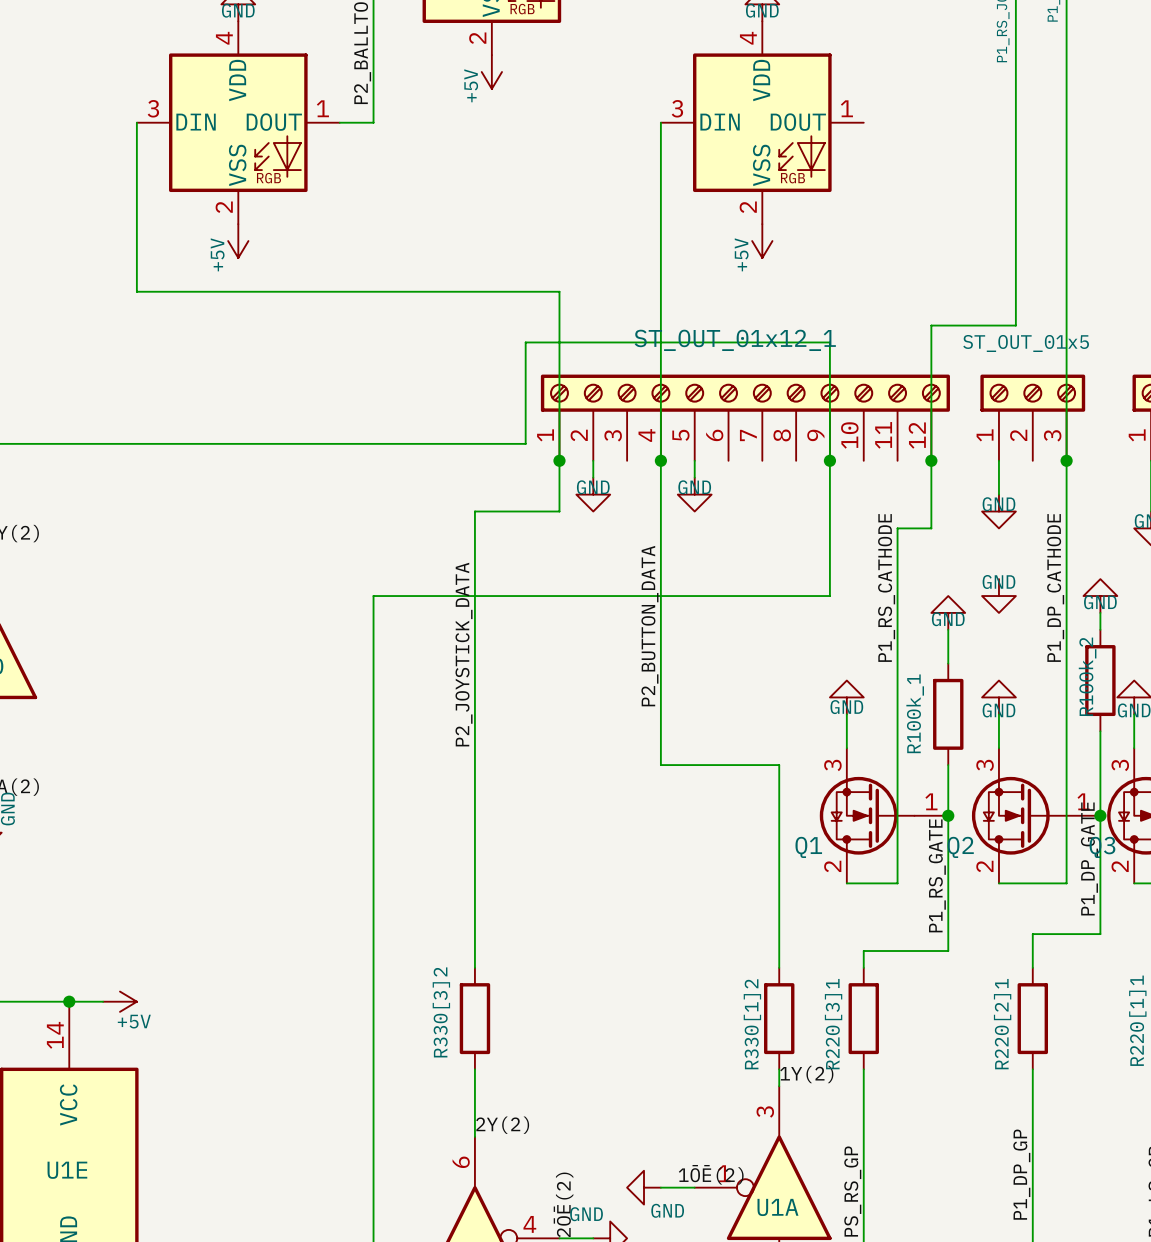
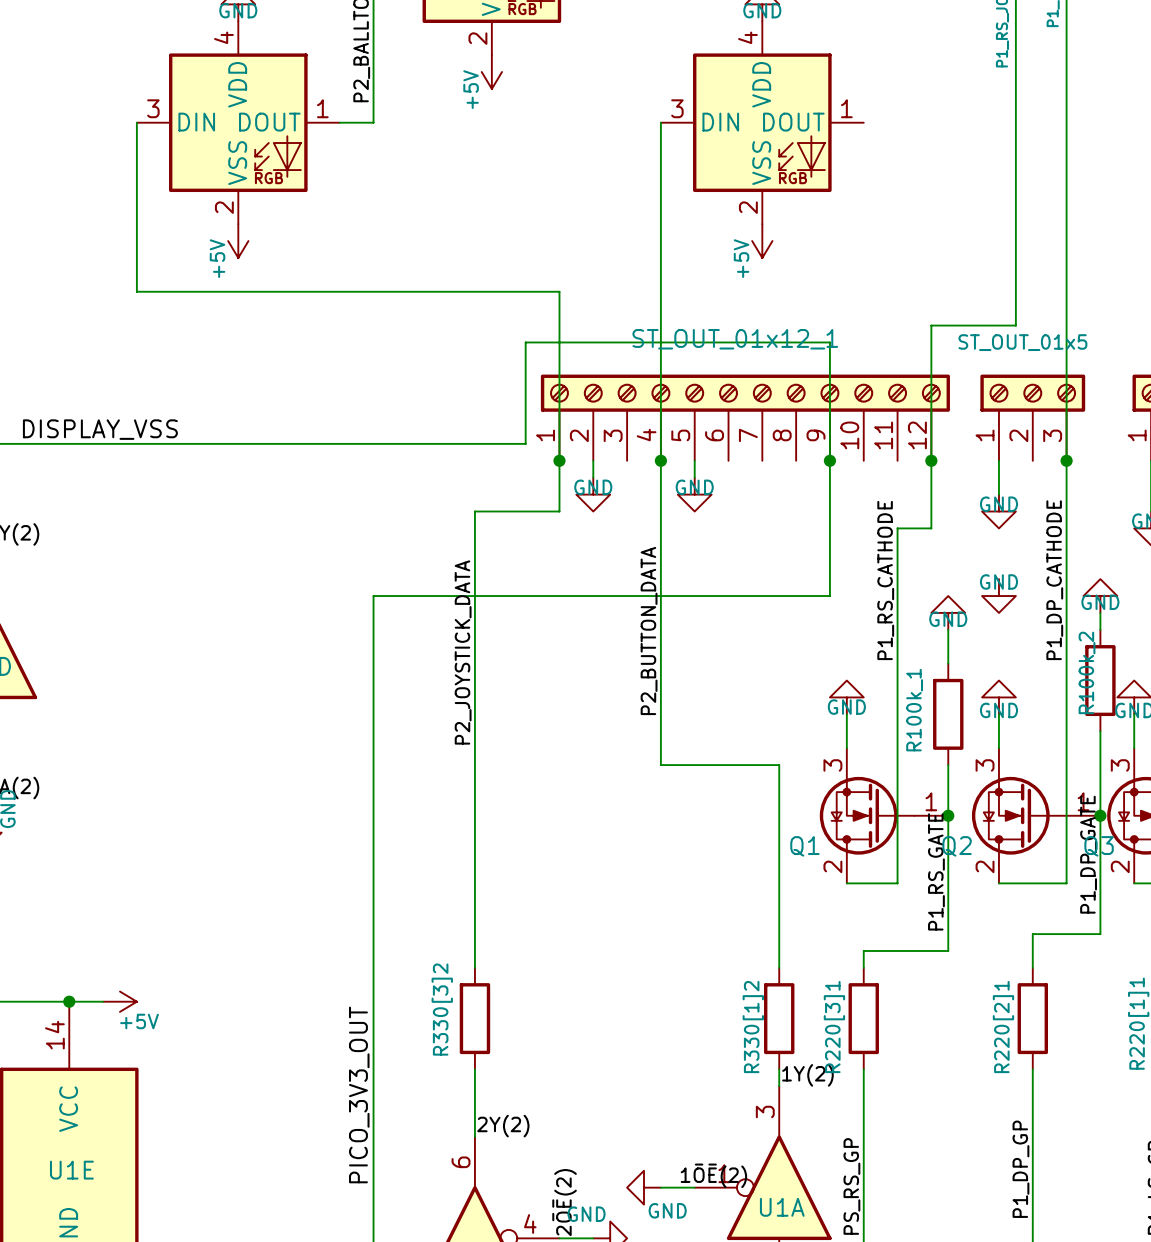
label: none -> DISPLAY_VSS (100, 429)
label: none -> PICO_3V3_OUT (359, 1094)

